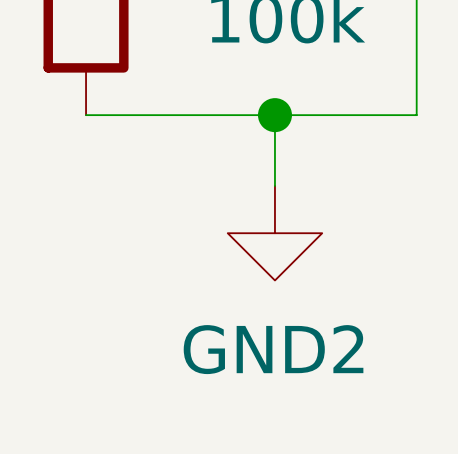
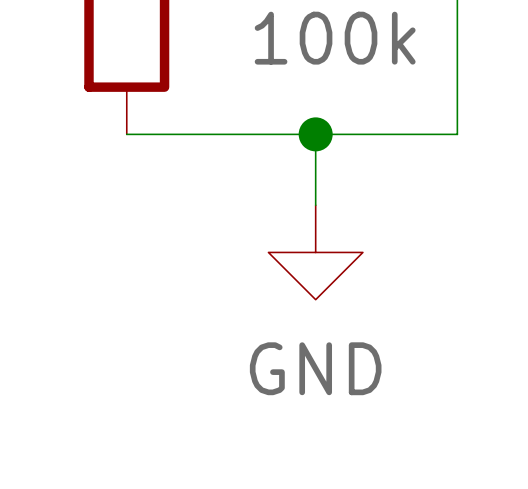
power symbol: GND2 (274, 233) -> GND (315, 252)

